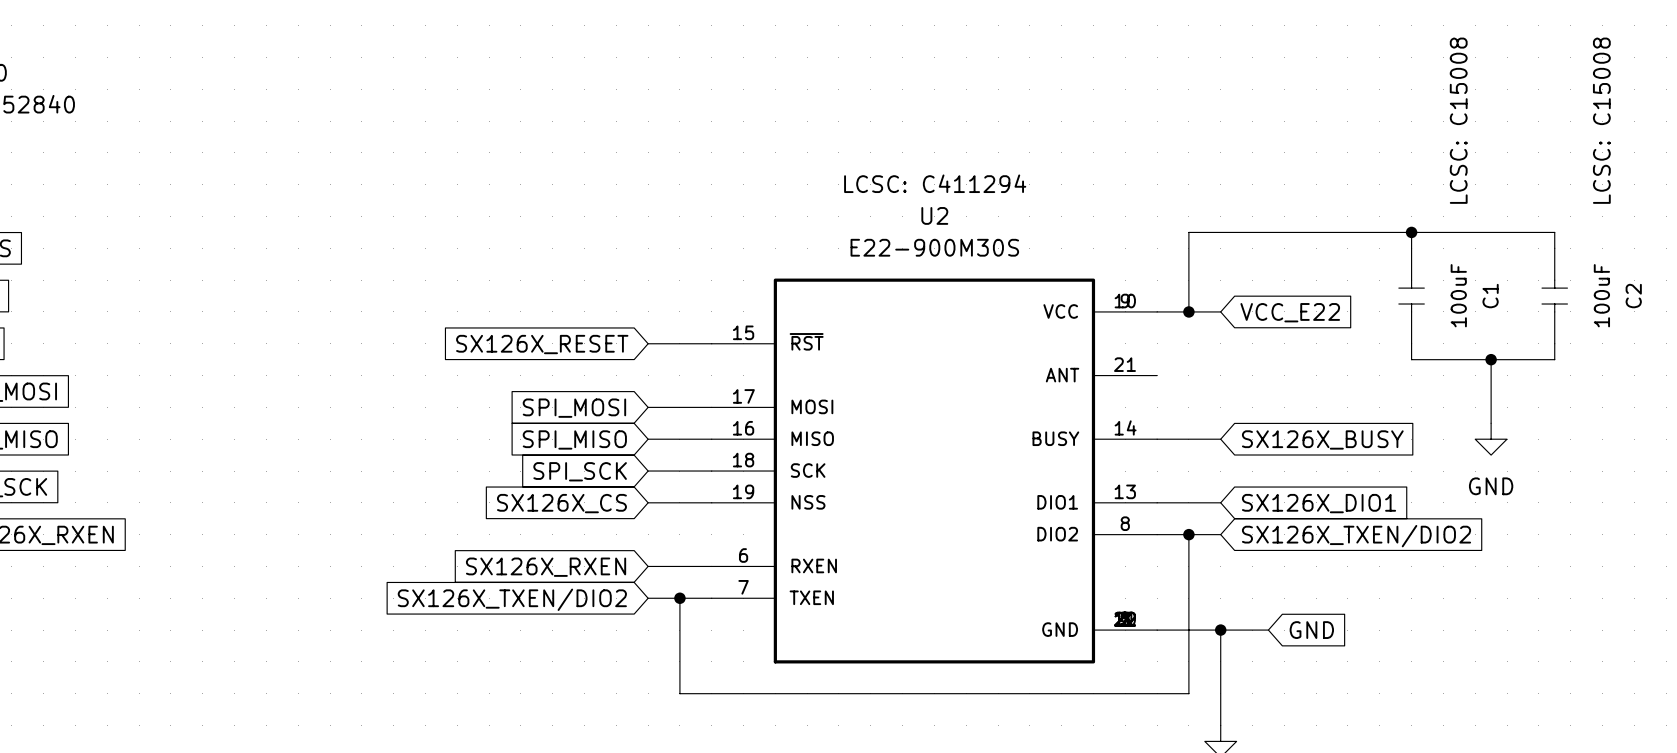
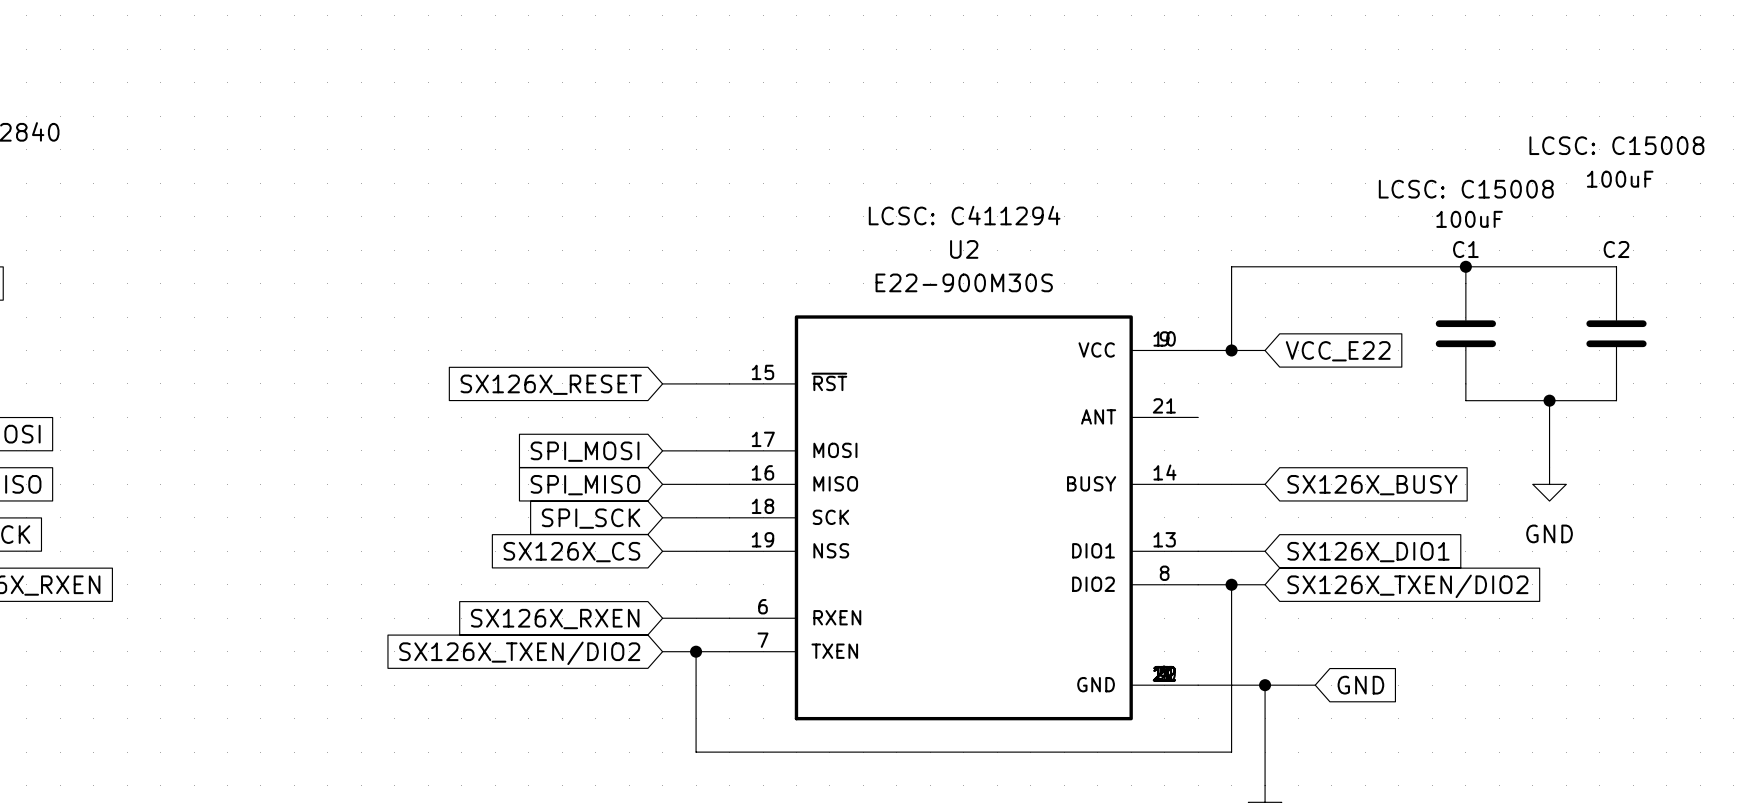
C1 text position: LCSC: C15008 (1458, 120) -> LCSC: C15008 (1466, 189)
C2 text position: LCSC: C15008 (1601, 120) -> LCSC: C15008 (1616, 145)
C1 symbol: [1398, 248, 1425, 344] -> [1435, 283, 1497, 384]
C2 symbol: [1542, 248, 1568, 344] -> [1586, 283, 1647, 384]
C1 value position: 100uF (1458, 295) -> 100uF (1469, 219)
C2 value position: 100uF (1601, 295) -> 100uF (1620, 179)
C1 name position: C1 (1490, 296) -> C1 (1465, 249)
C2 name position: C2 (1633, 296) -> C2 (1616, 249)

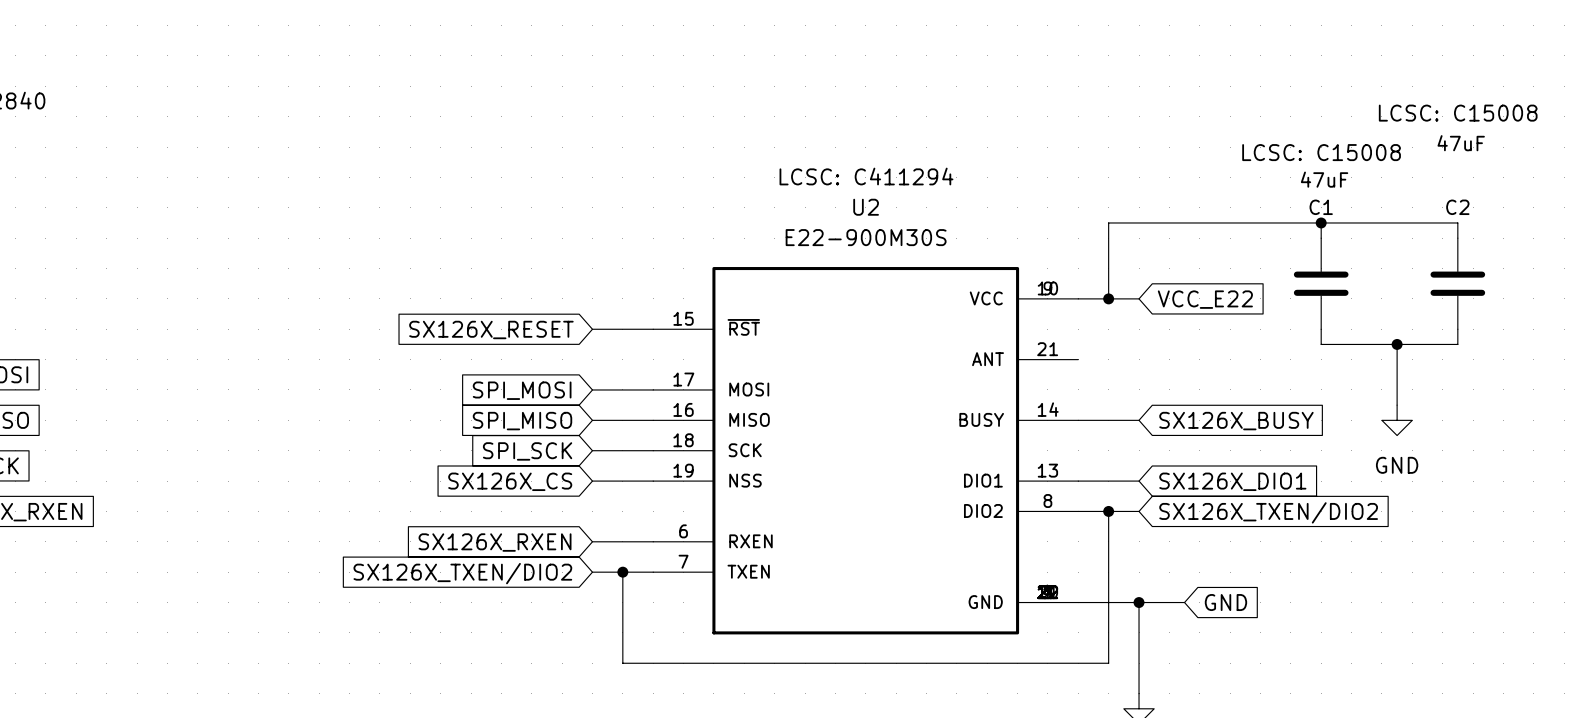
C2 value: 100uF (1620, 179) -> 47uF (1461, 143)
C1 value: 100uF (1469, 219) -> 47uF (1324, 179)

